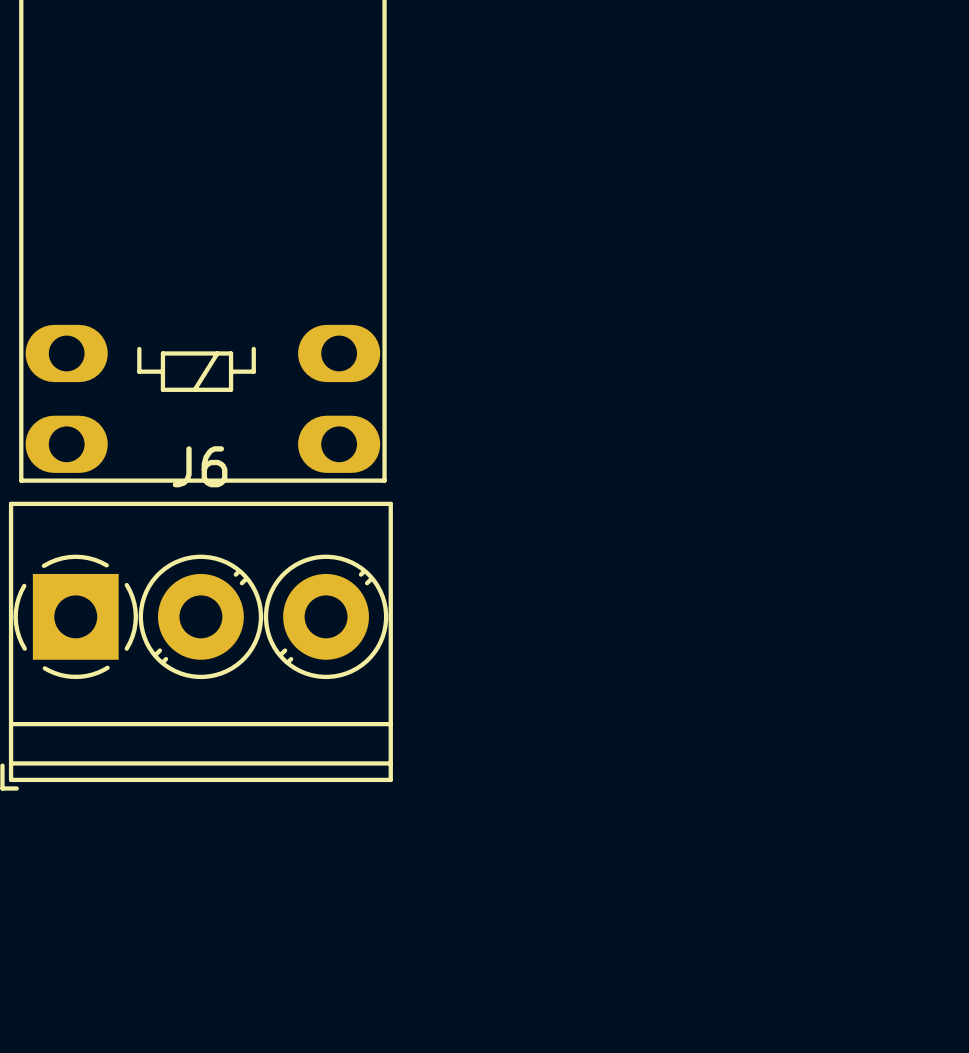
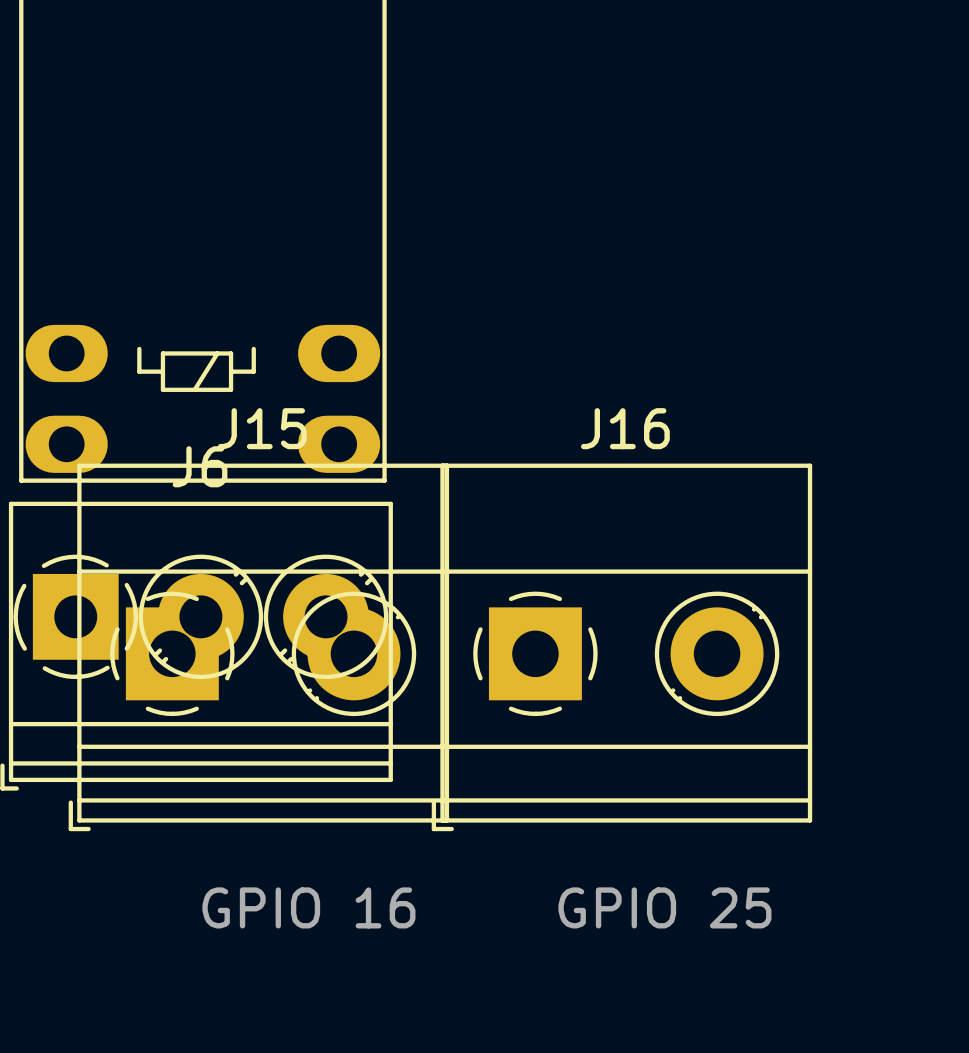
J15: none -> (258, 647)
J16: none -> (621, 647)
text: none -> GPIO 16 (308, 907)
text: none -> GPIO 25 (664, 907)

